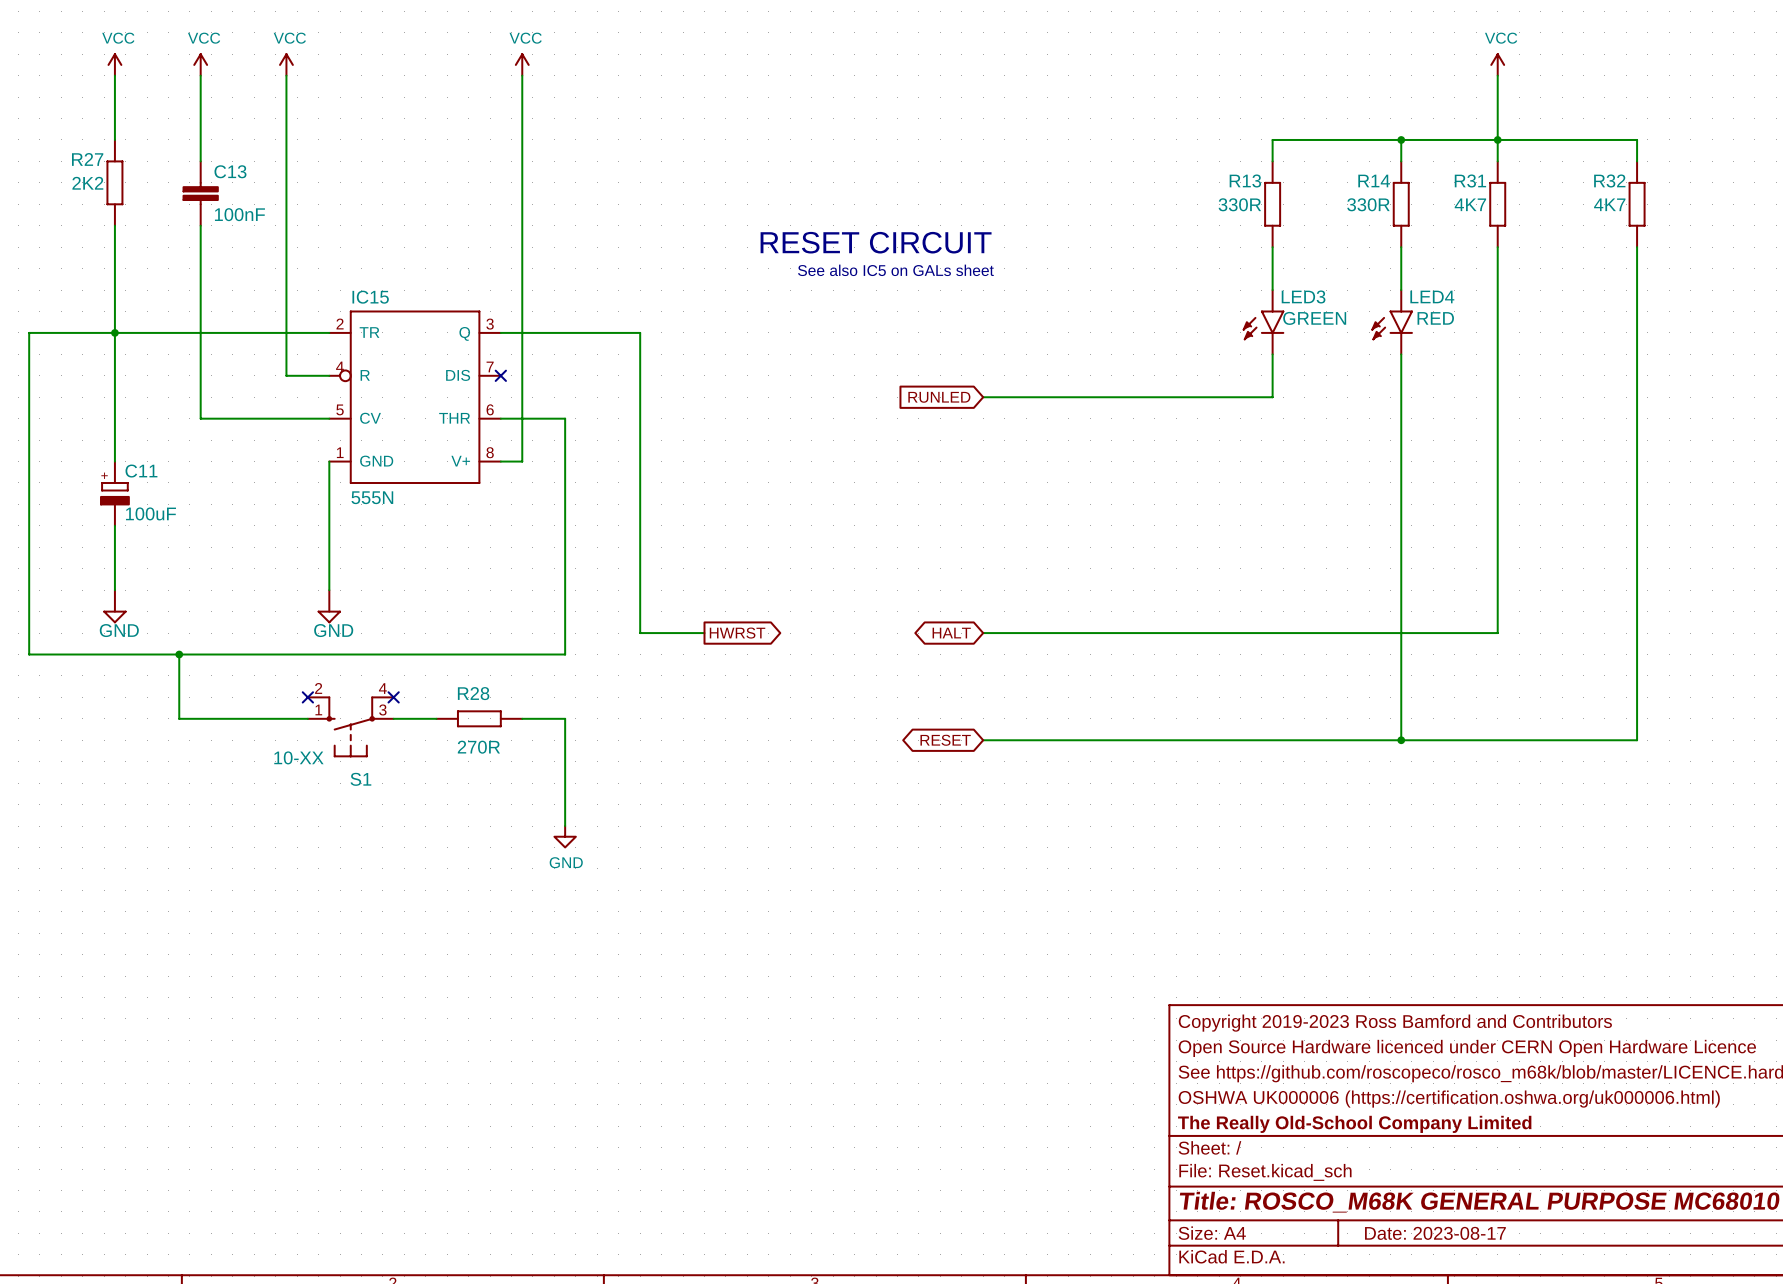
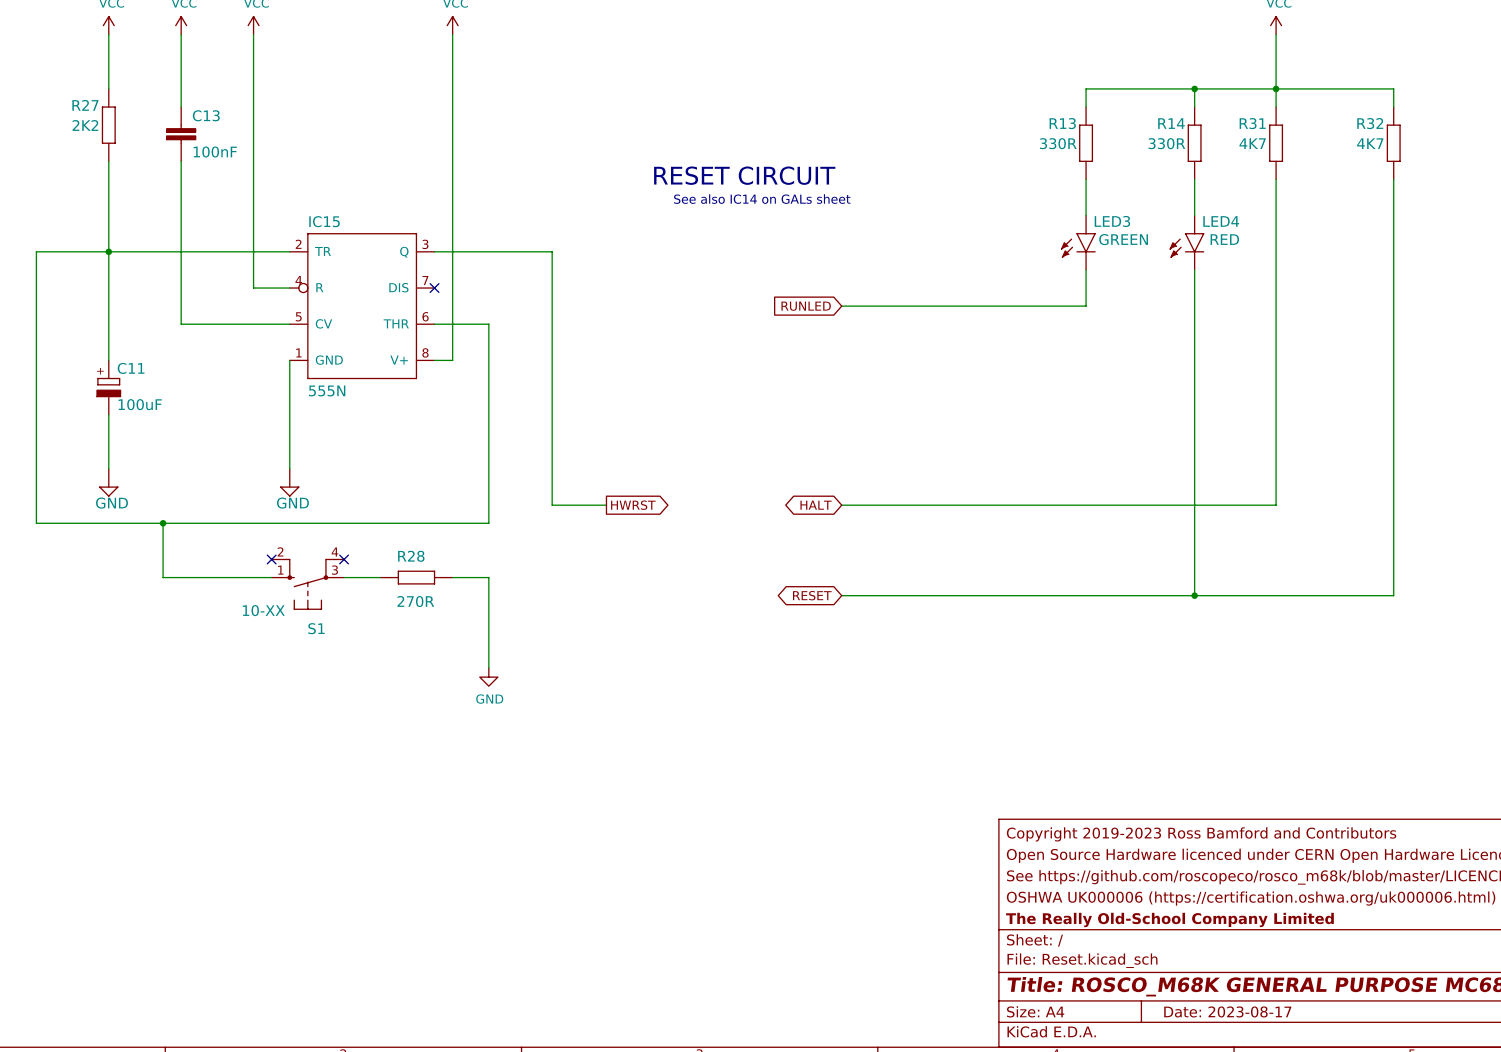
text: See also IC5 on GALs sheet (895, 270) -> See also IC14 on GALs sheet (762, 199)

